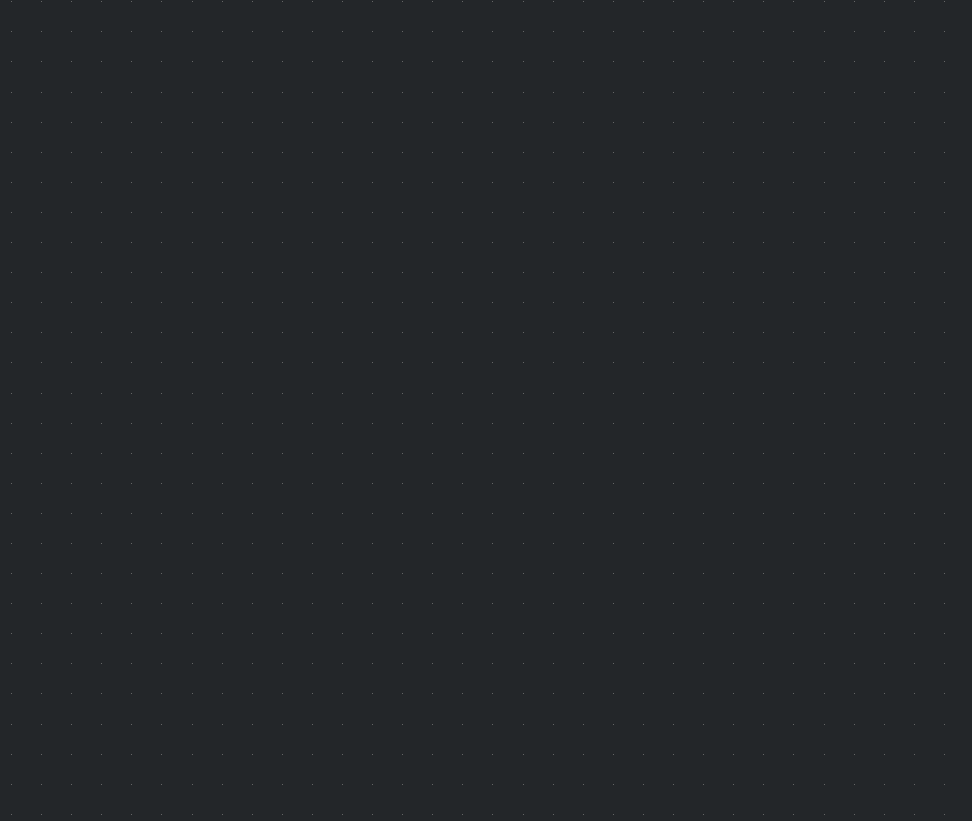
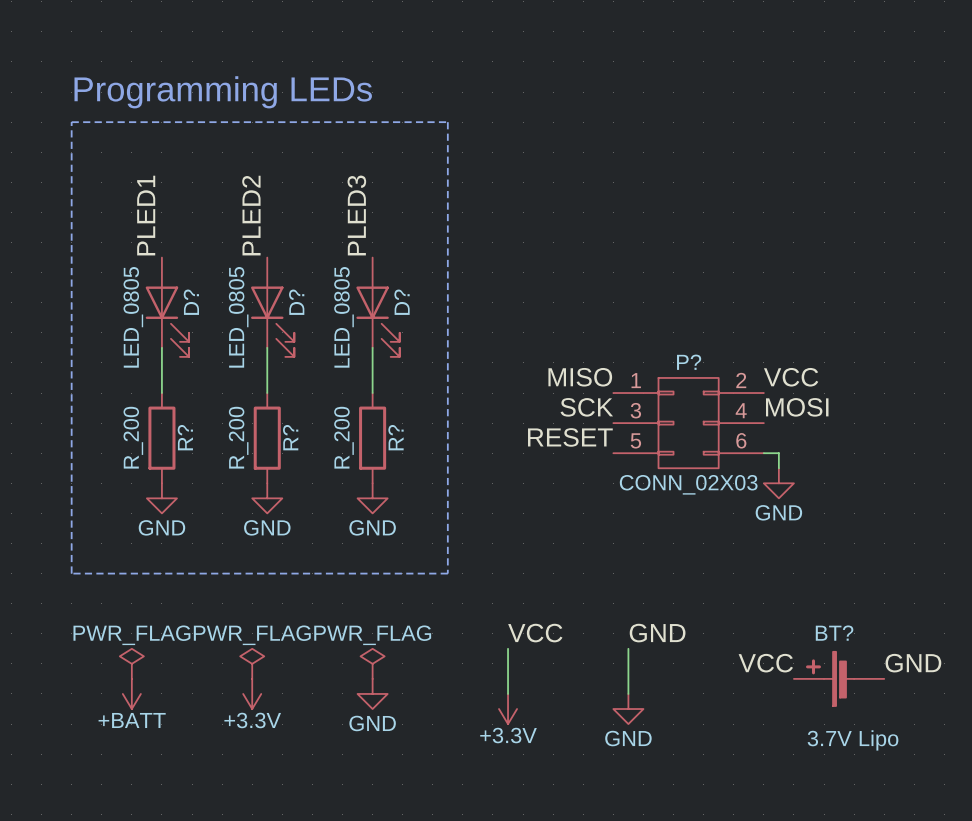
text: none -> Programming LEDs (223, 92)
line: none -> (71, 122) (71, 573) (447, 573) (447, 122) (71, 122)
label: none -> PLED1 (146, 215)
label: none -> PLED2 (251, 215)
label: none -> PLED3 (356, 215)
D?: none -> LED_0805 (167, 307)
D?: none -> LED_0805 (272, 307)
D?: none -> LED_0805 (378, 307)
wire: none -> (161, 347) (161, 393)
wire: none -> (267, 347) (267, 393)
wire: none -> (372, 347) (372, 393)
label: none -> MISO (580, 377)
label: none -> VCC (791, 377)
label: none -> SCK (586, 407)
label: none -> MOSI (797, 407)
P?: none -> CONN_02X03 (688, 423)
label: none -> RESET (570, 437)
R?: none -> R_200 (161, 438)
R?: none -> R_200 (267, 438)
R?: none -> R_200 (372, 438)
wire: none -> (763, 453) (778, 453) (778, 468)
power symbol: none -> GND (778, 483)
power symbol: none -> GND (161, 498)
power symbol: none -> GND (267, 498)
power symbol: none -> GND (372, 498)
label: none -> VCC (535, 633)
label: none -> GND (657, 633)
wire: none -> (508, 648) (508, 693)
wire: none -> (628, 648) (628, 693)
power symbol: none -> PWR_FLAG (131, 663)
power symbol: none -> PWR_FLAG (252, 663)
power symbol: none -> PWR_FLAG (372, 663)
label: none -> VCC (765, 663)
label: none -> GND (913, 663)
BT?: none -> 3.7V Lipo (839, 678)
power symbol: none -> +BATT (131, 693)
power symbol: none -> +3.3V (252, 693)
power symbol: none -> GND (372, 693)
power symbol: none -> +3.3V (508, 709)
power symbol: none -> GND (628, 709)

